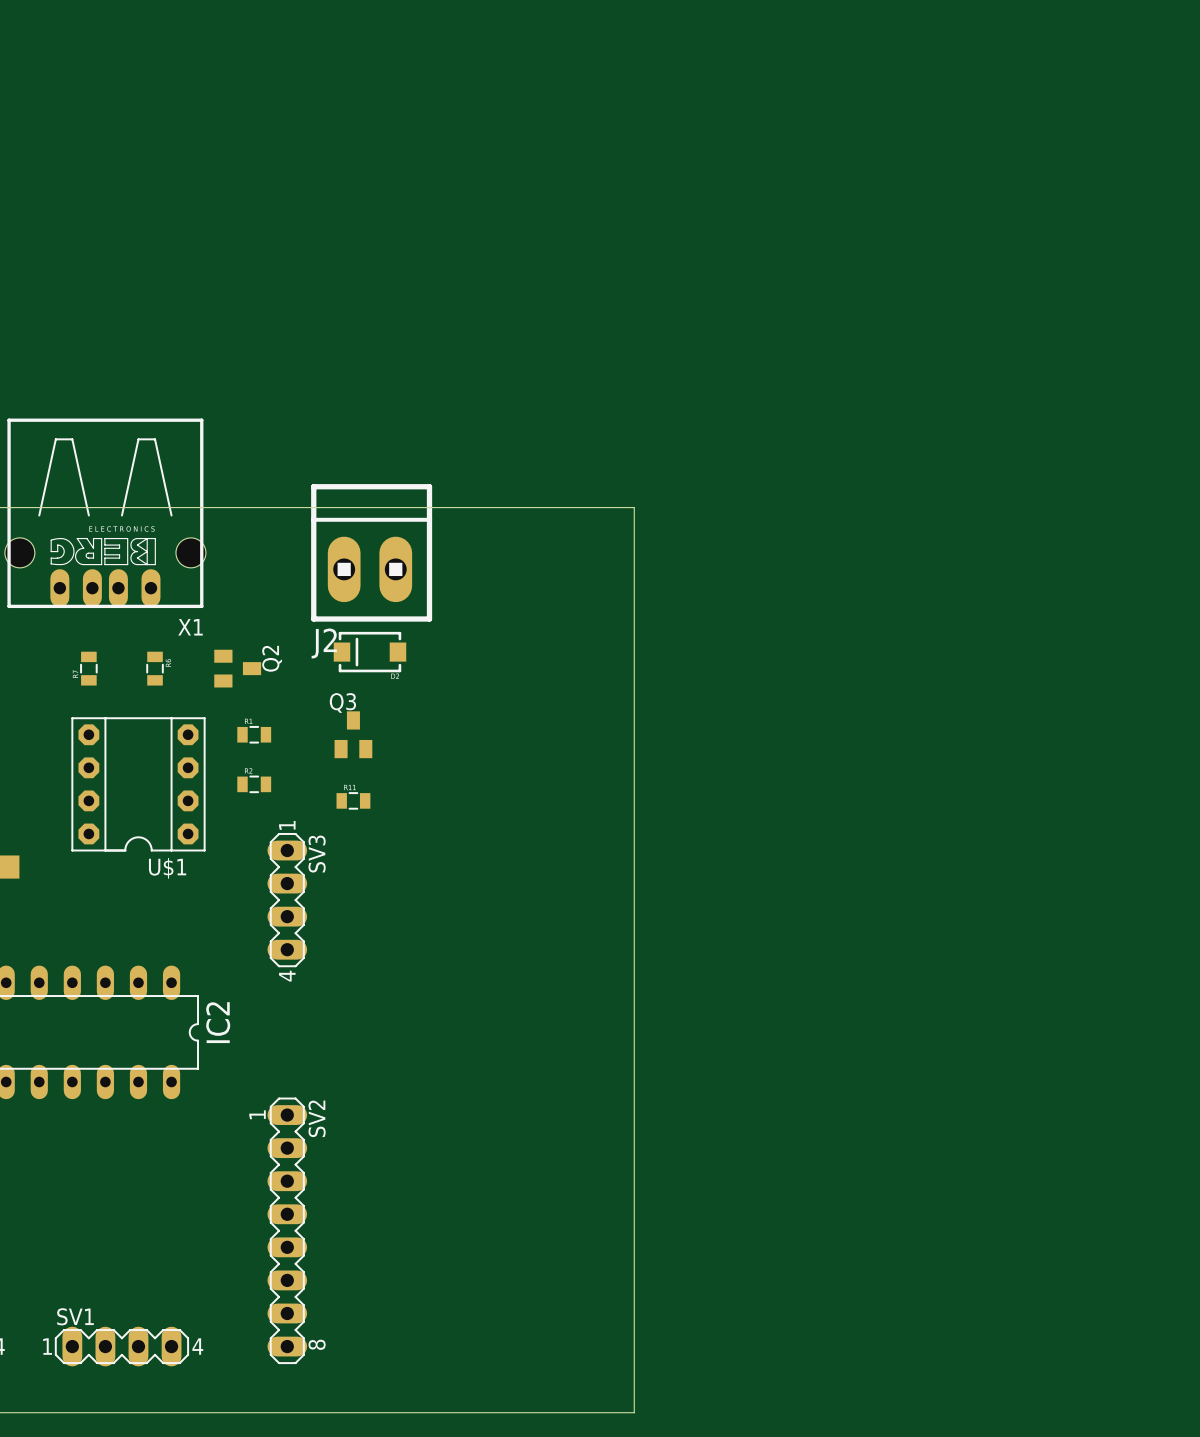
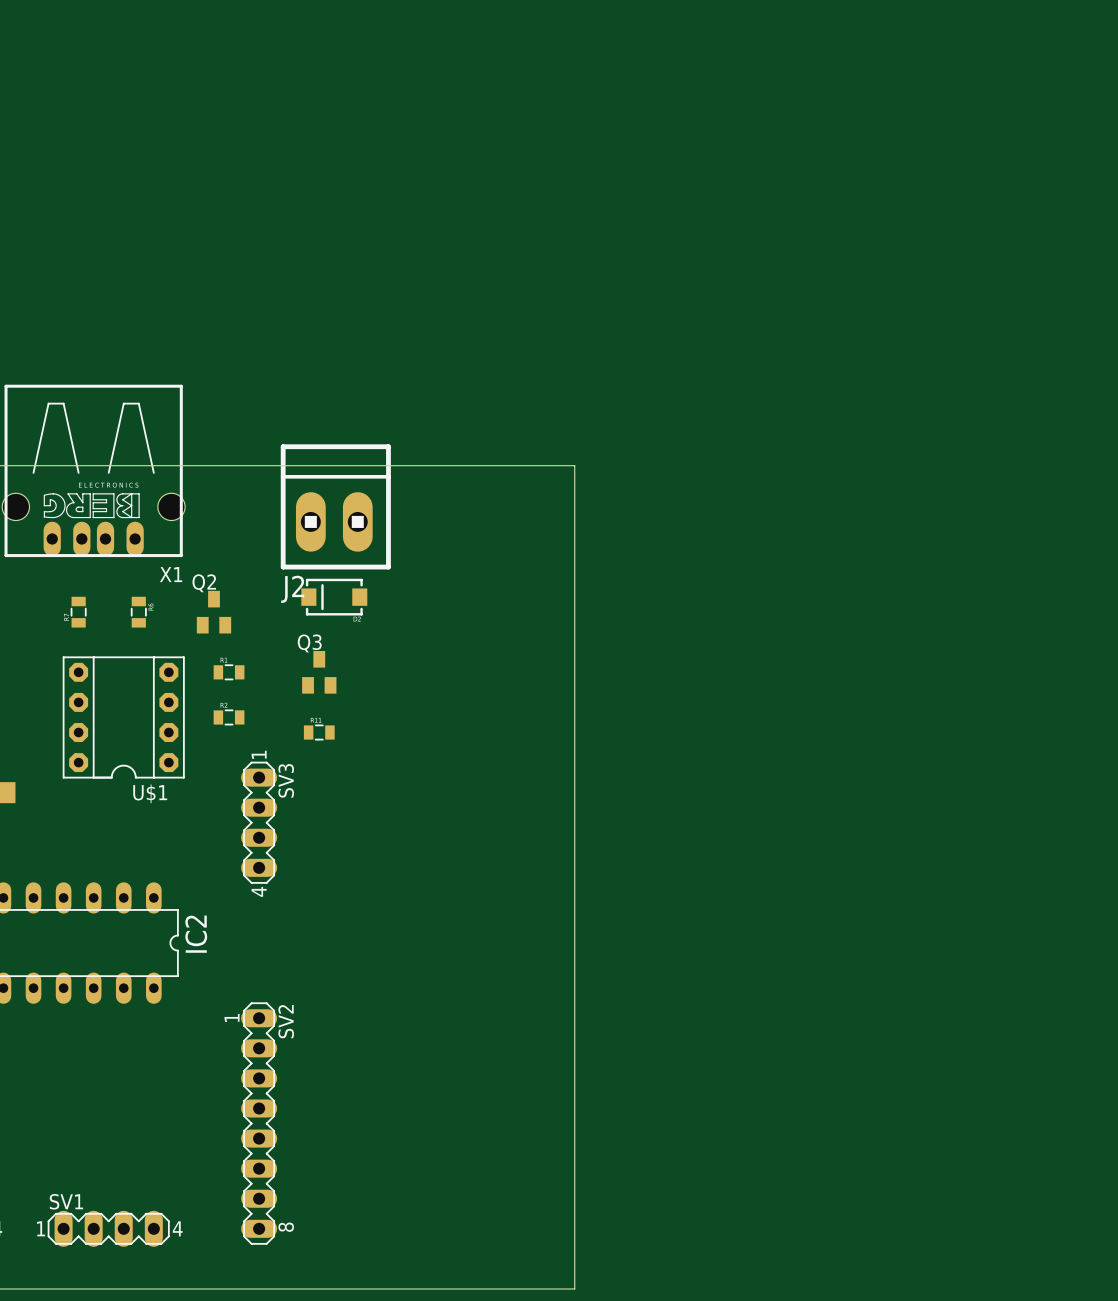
Q2 rotation: 0° (237, 668) -> 90° counterclockwise (213, 612)

